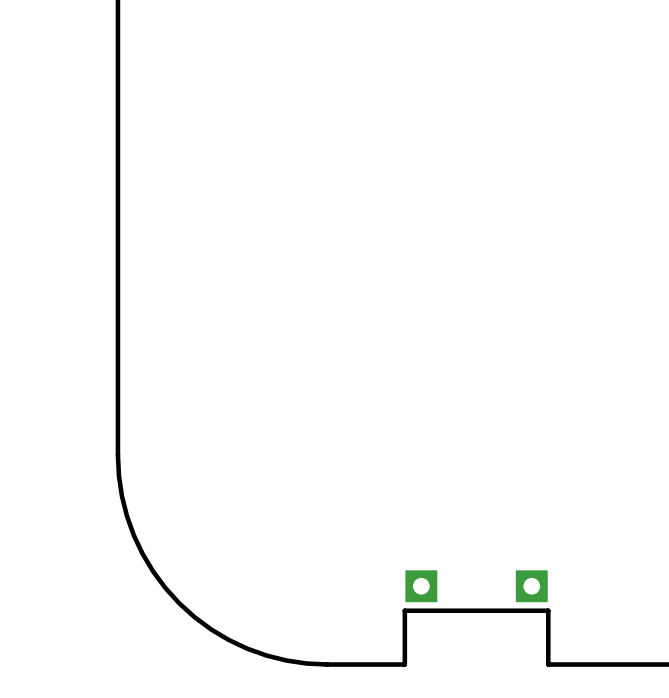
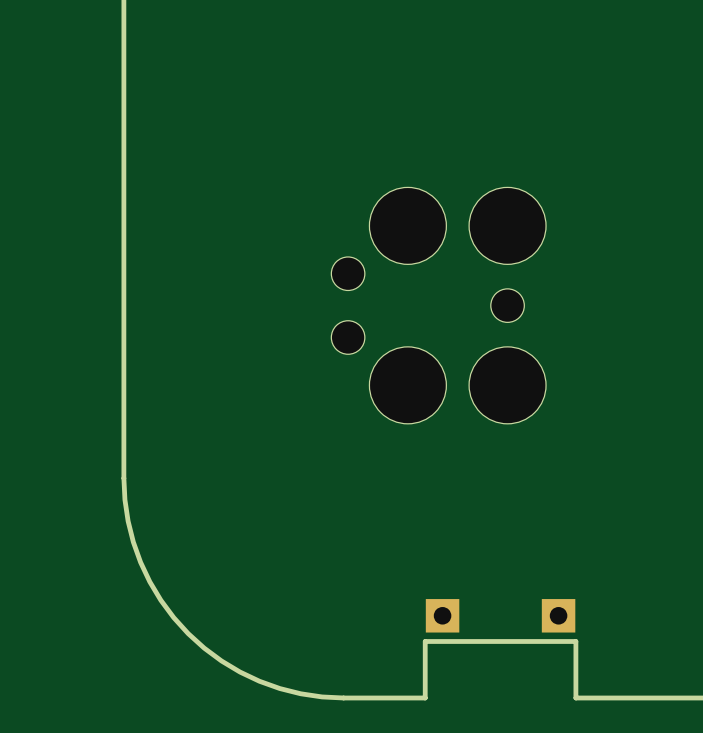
part: none -> (438, 305)

